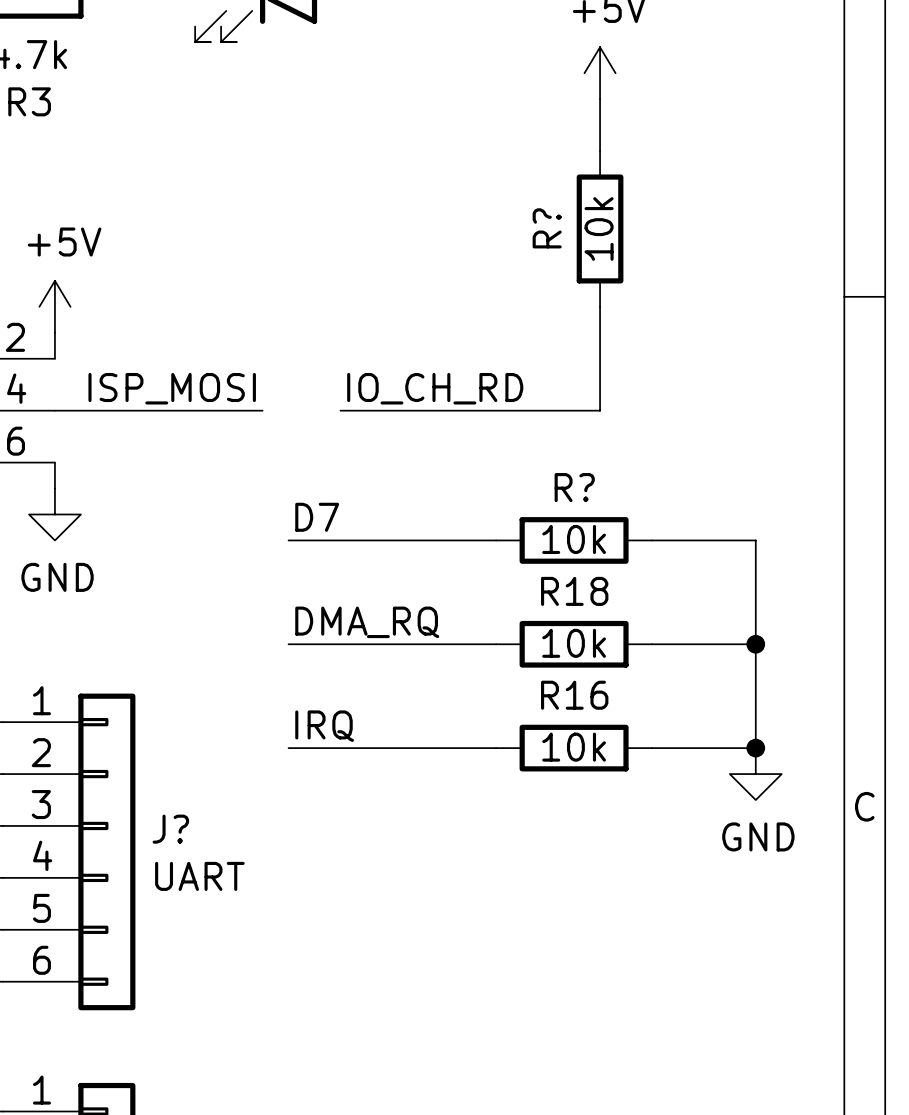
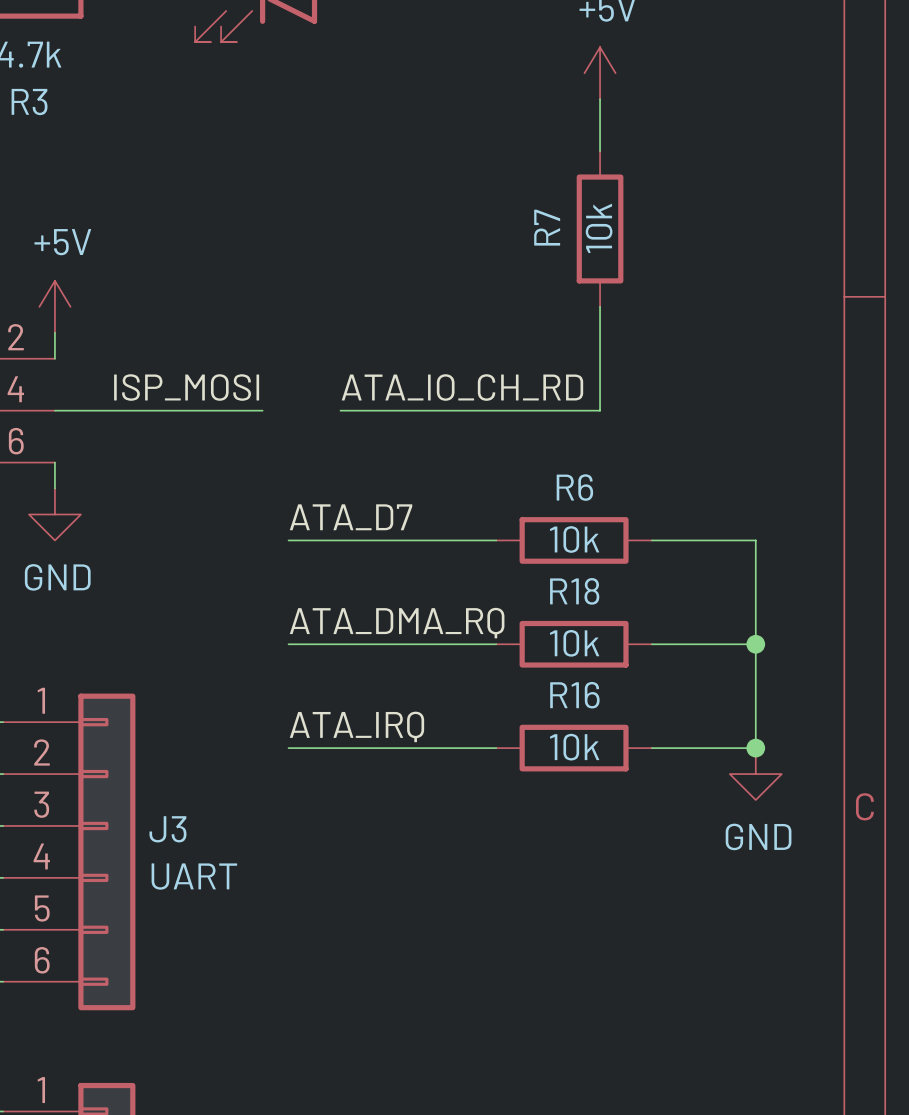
R? name: R? (547, 228) -> R7 (547, 227)
label: IO_CH_RD (435, 388) -> ATA_IO_CH_RD (462, 387)
R? name: R? (574, 487) -> R6 (574, 487)
label: D7 (317, 517) -> ATA_D7 (351, 517)
label: DMA_RQ (367, 622) -> ATA_DMA_RQ (397, 623)
label: IRQ (324, 726) -> ATA_IRQ (356, 726)
J? name: J? (170, 829) -> J3 (167, 829)

